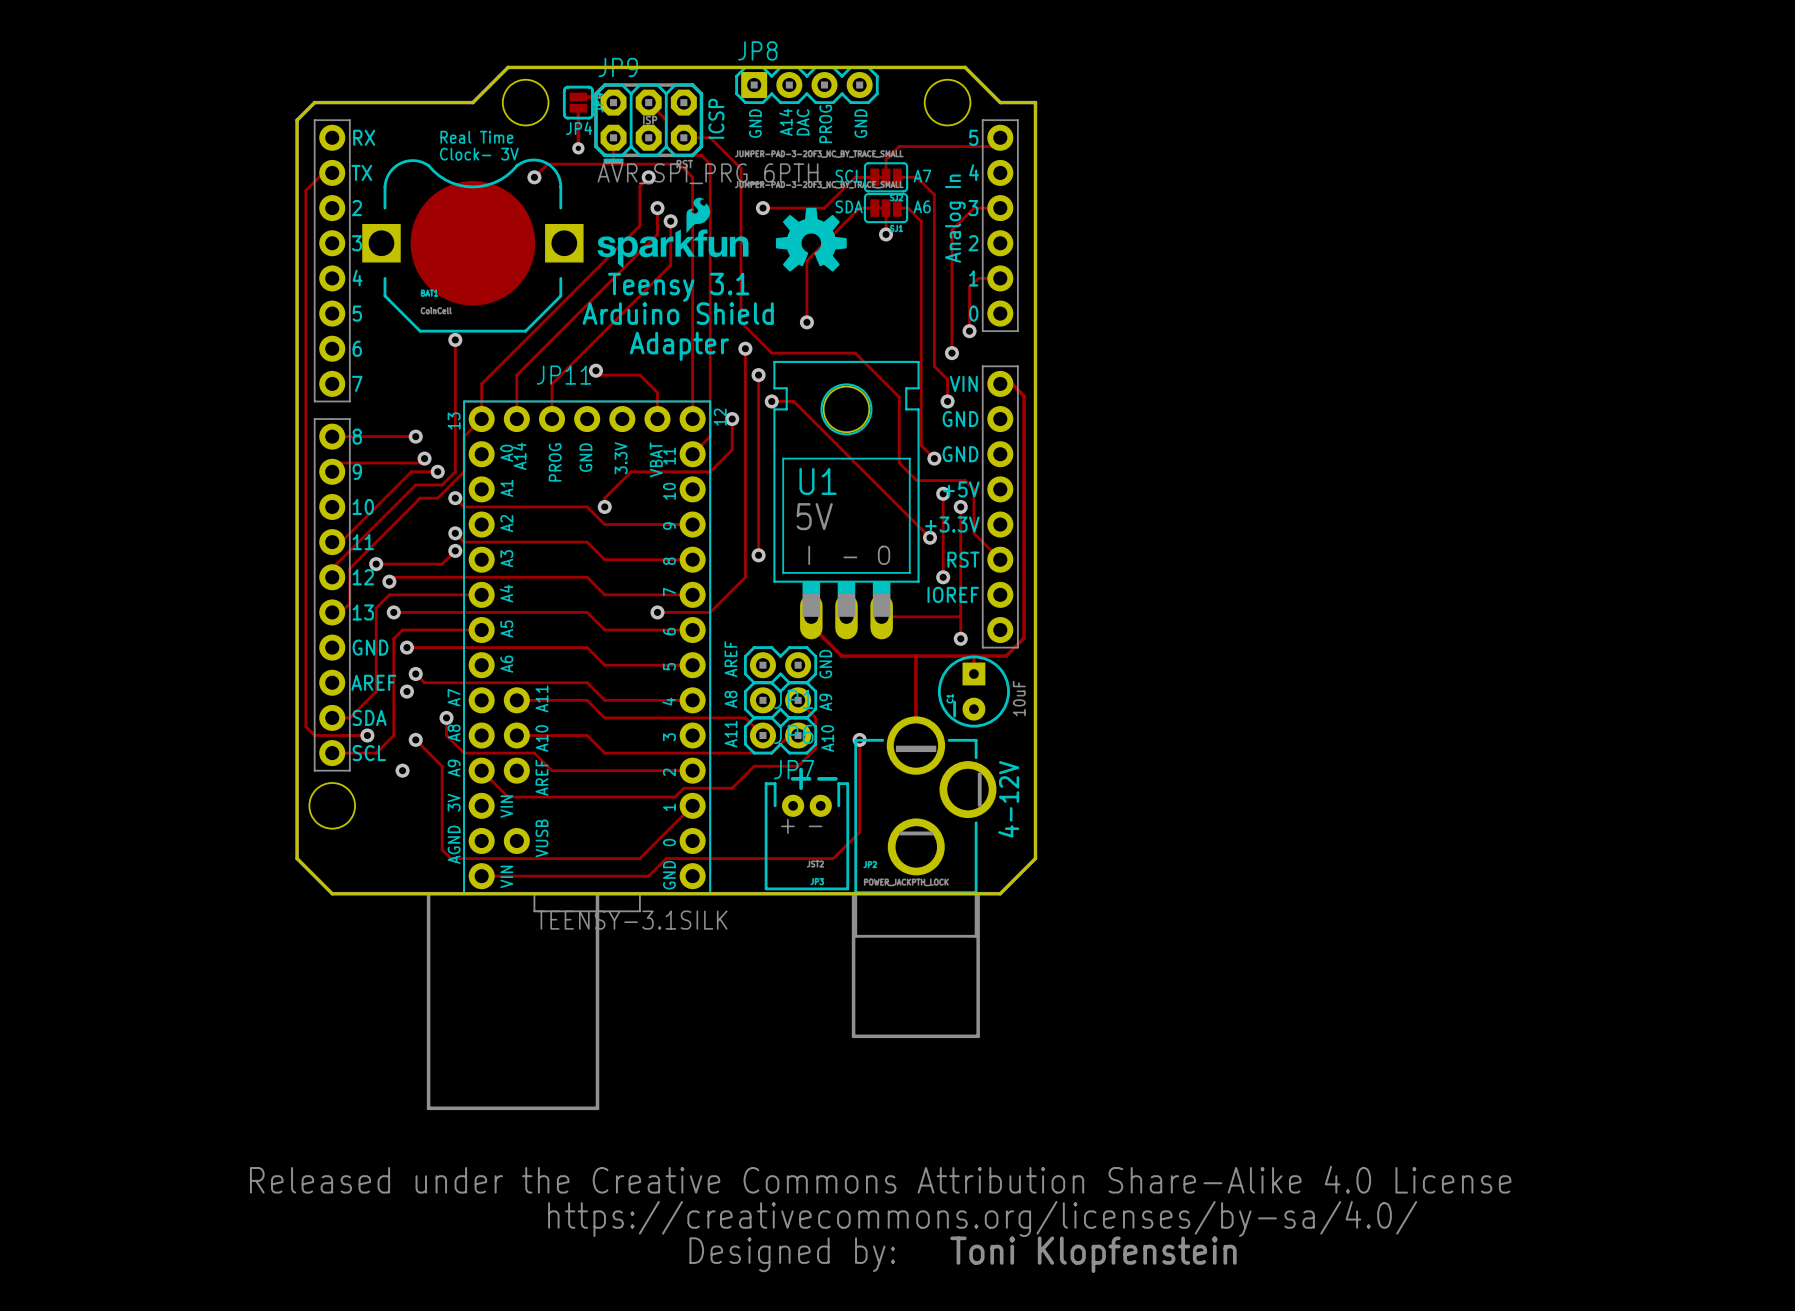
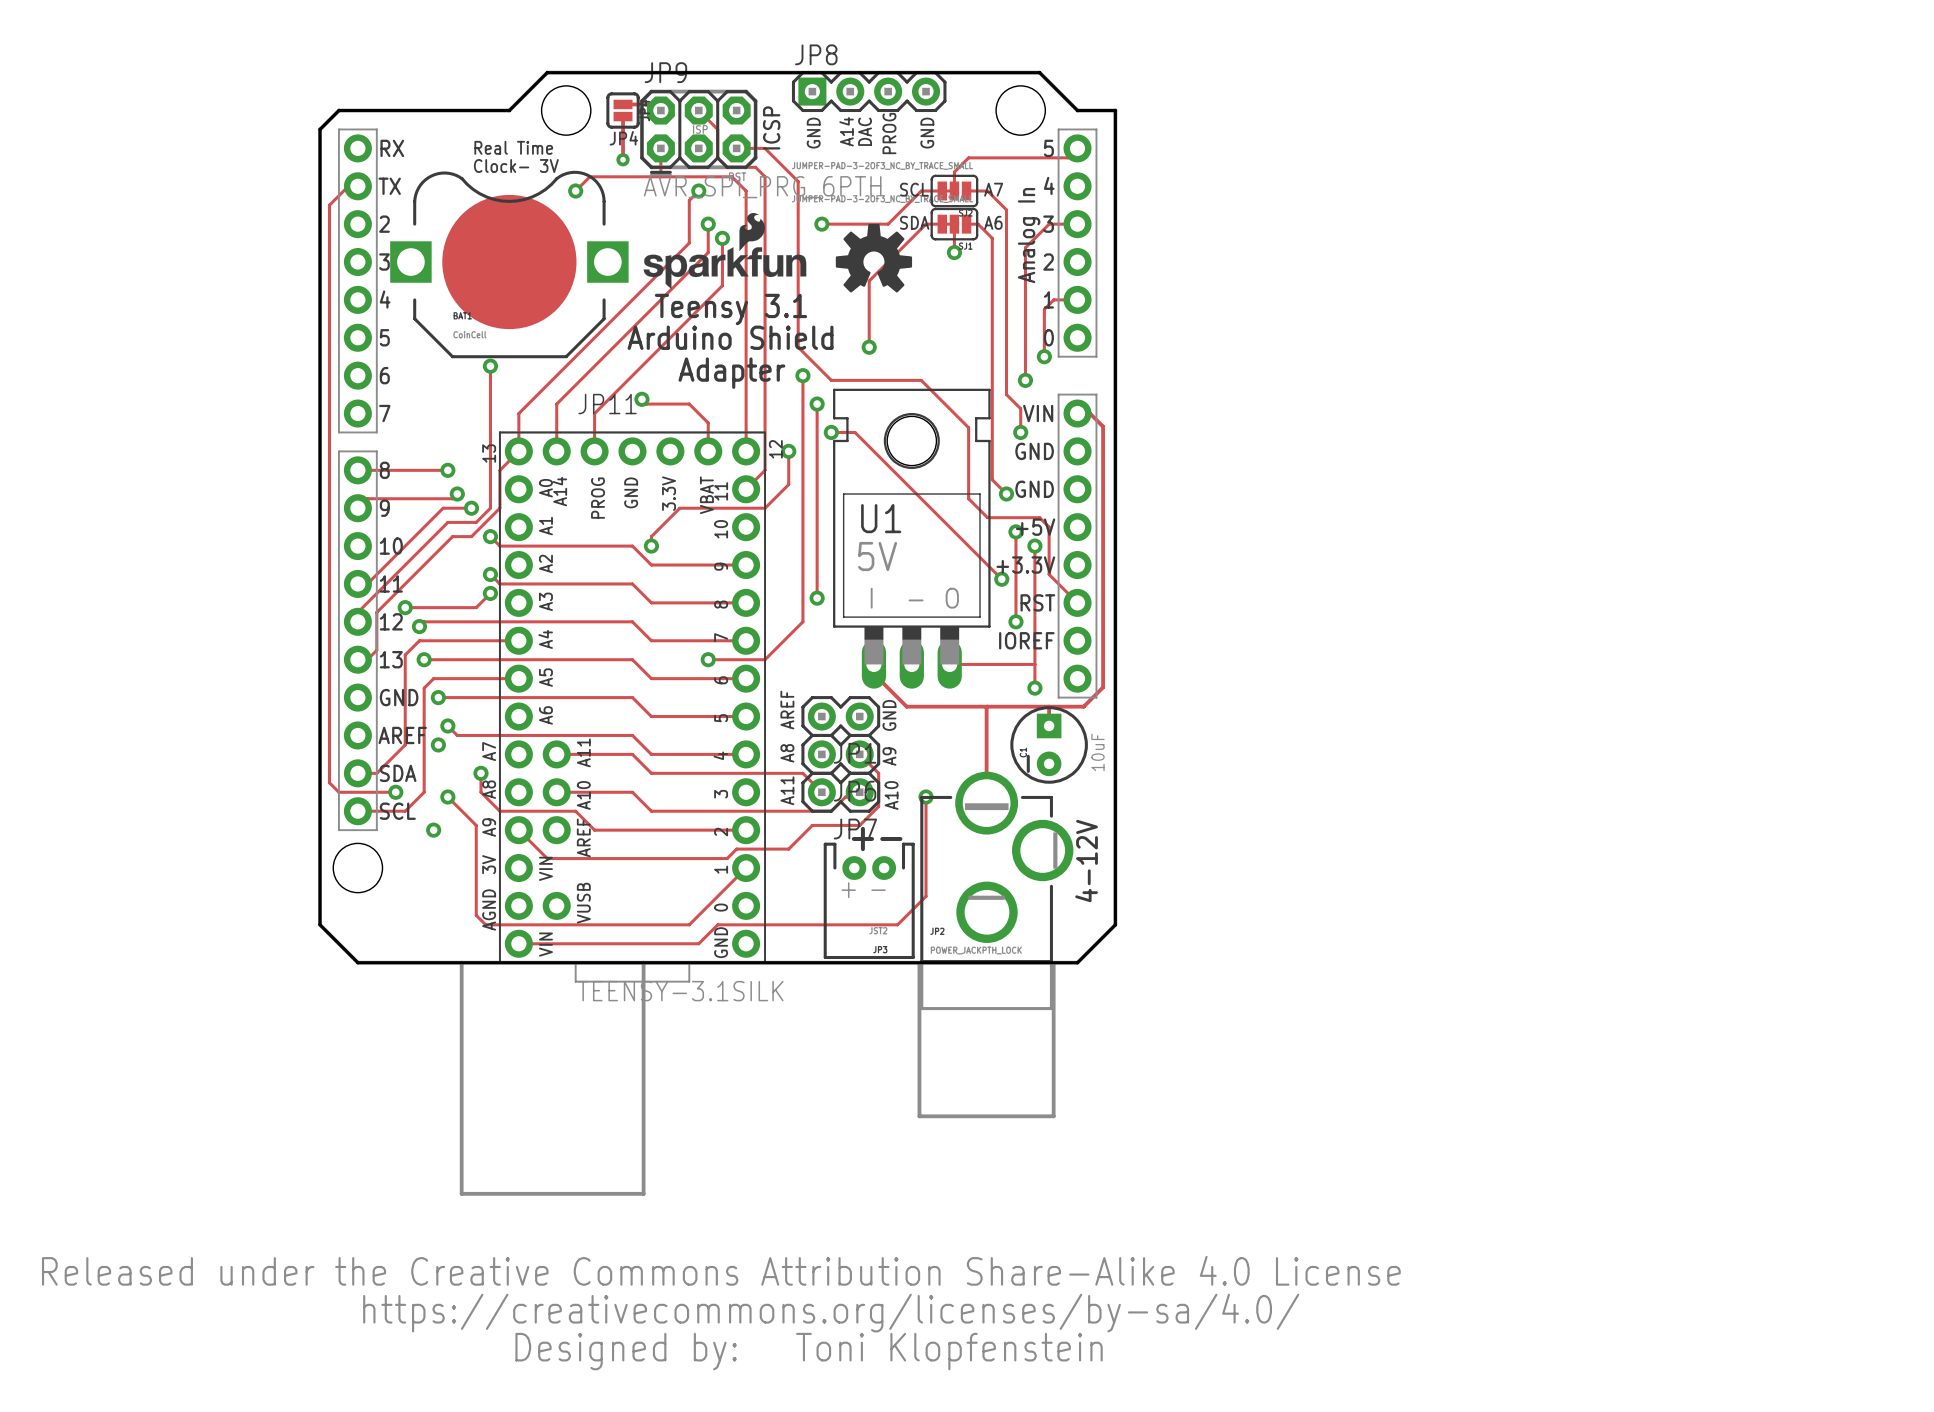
drawing: none -> [41, 1255, 1401, 1371]
drawing: [249, 1165, 1512, 1273] -> none
text: Toni Klopfenstein (1093, 1254) -> none

